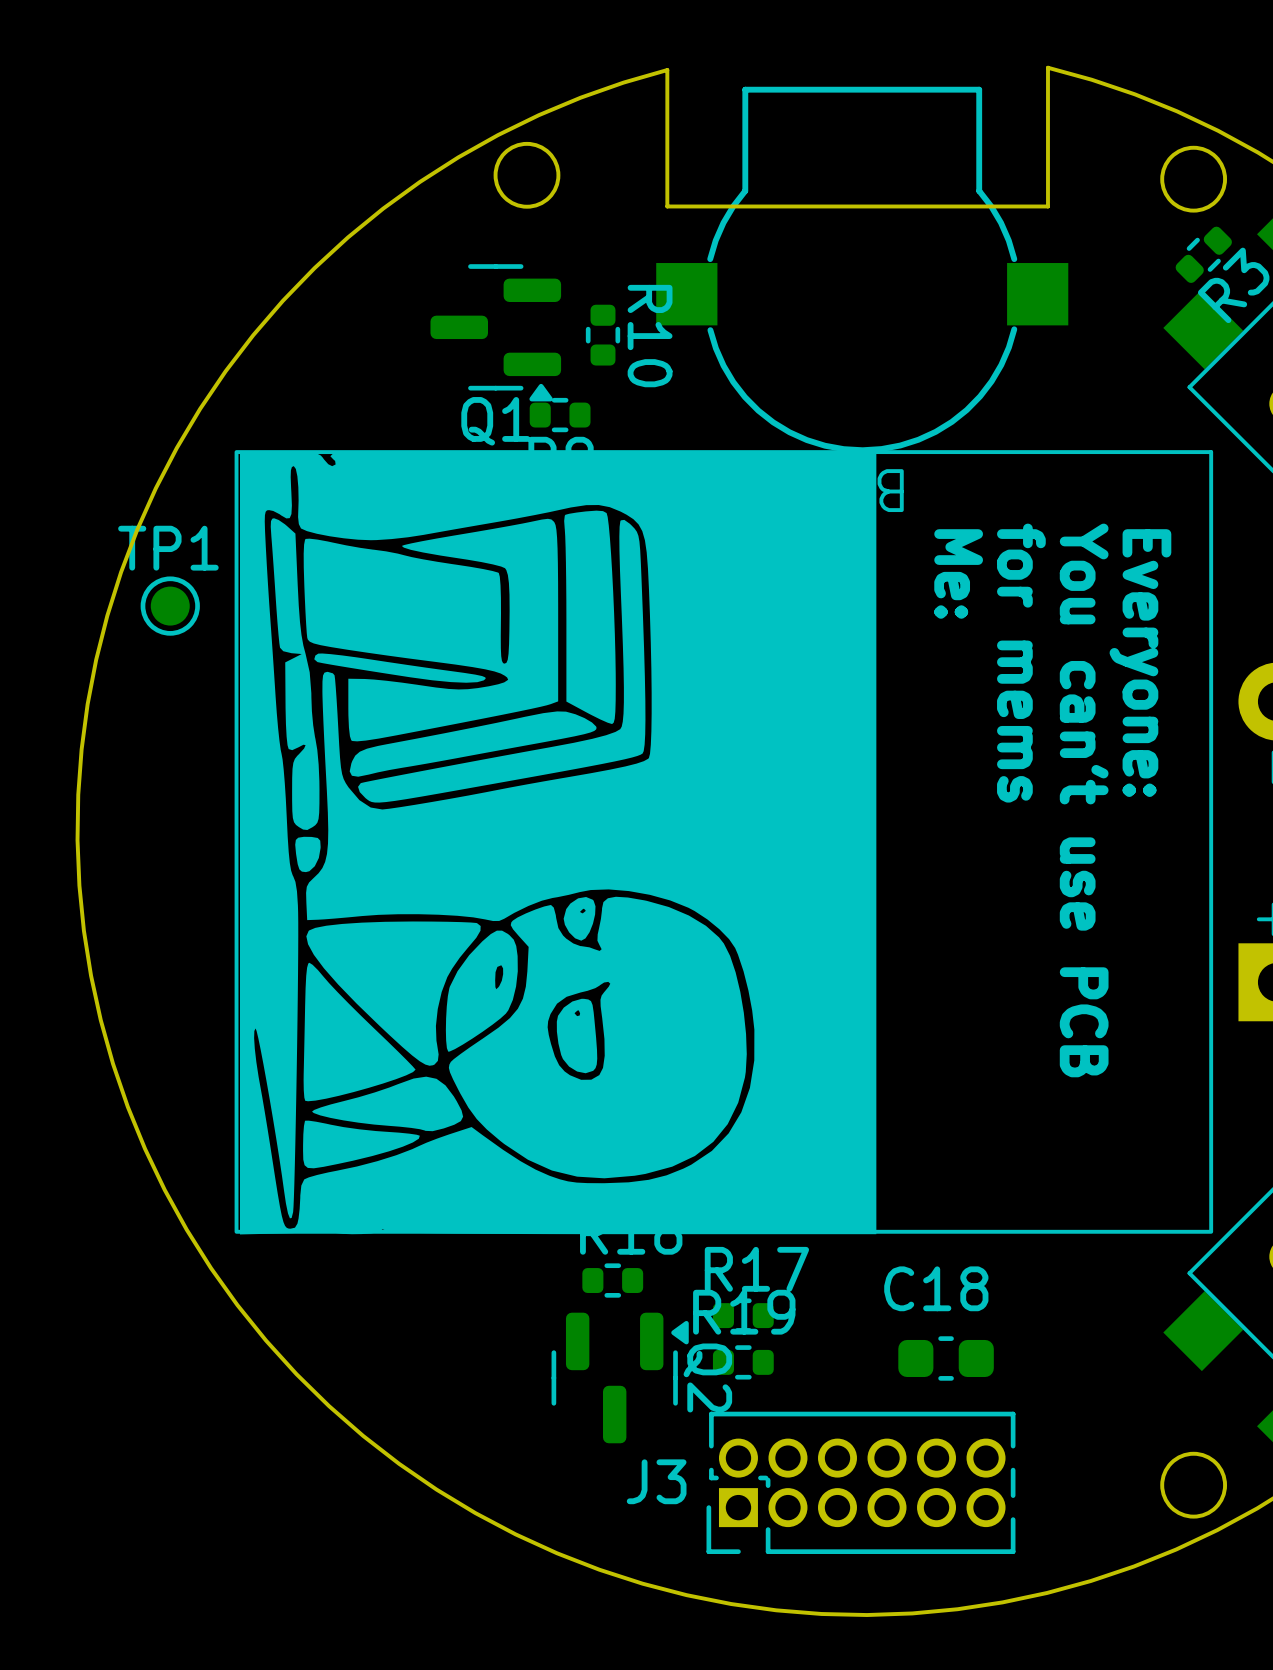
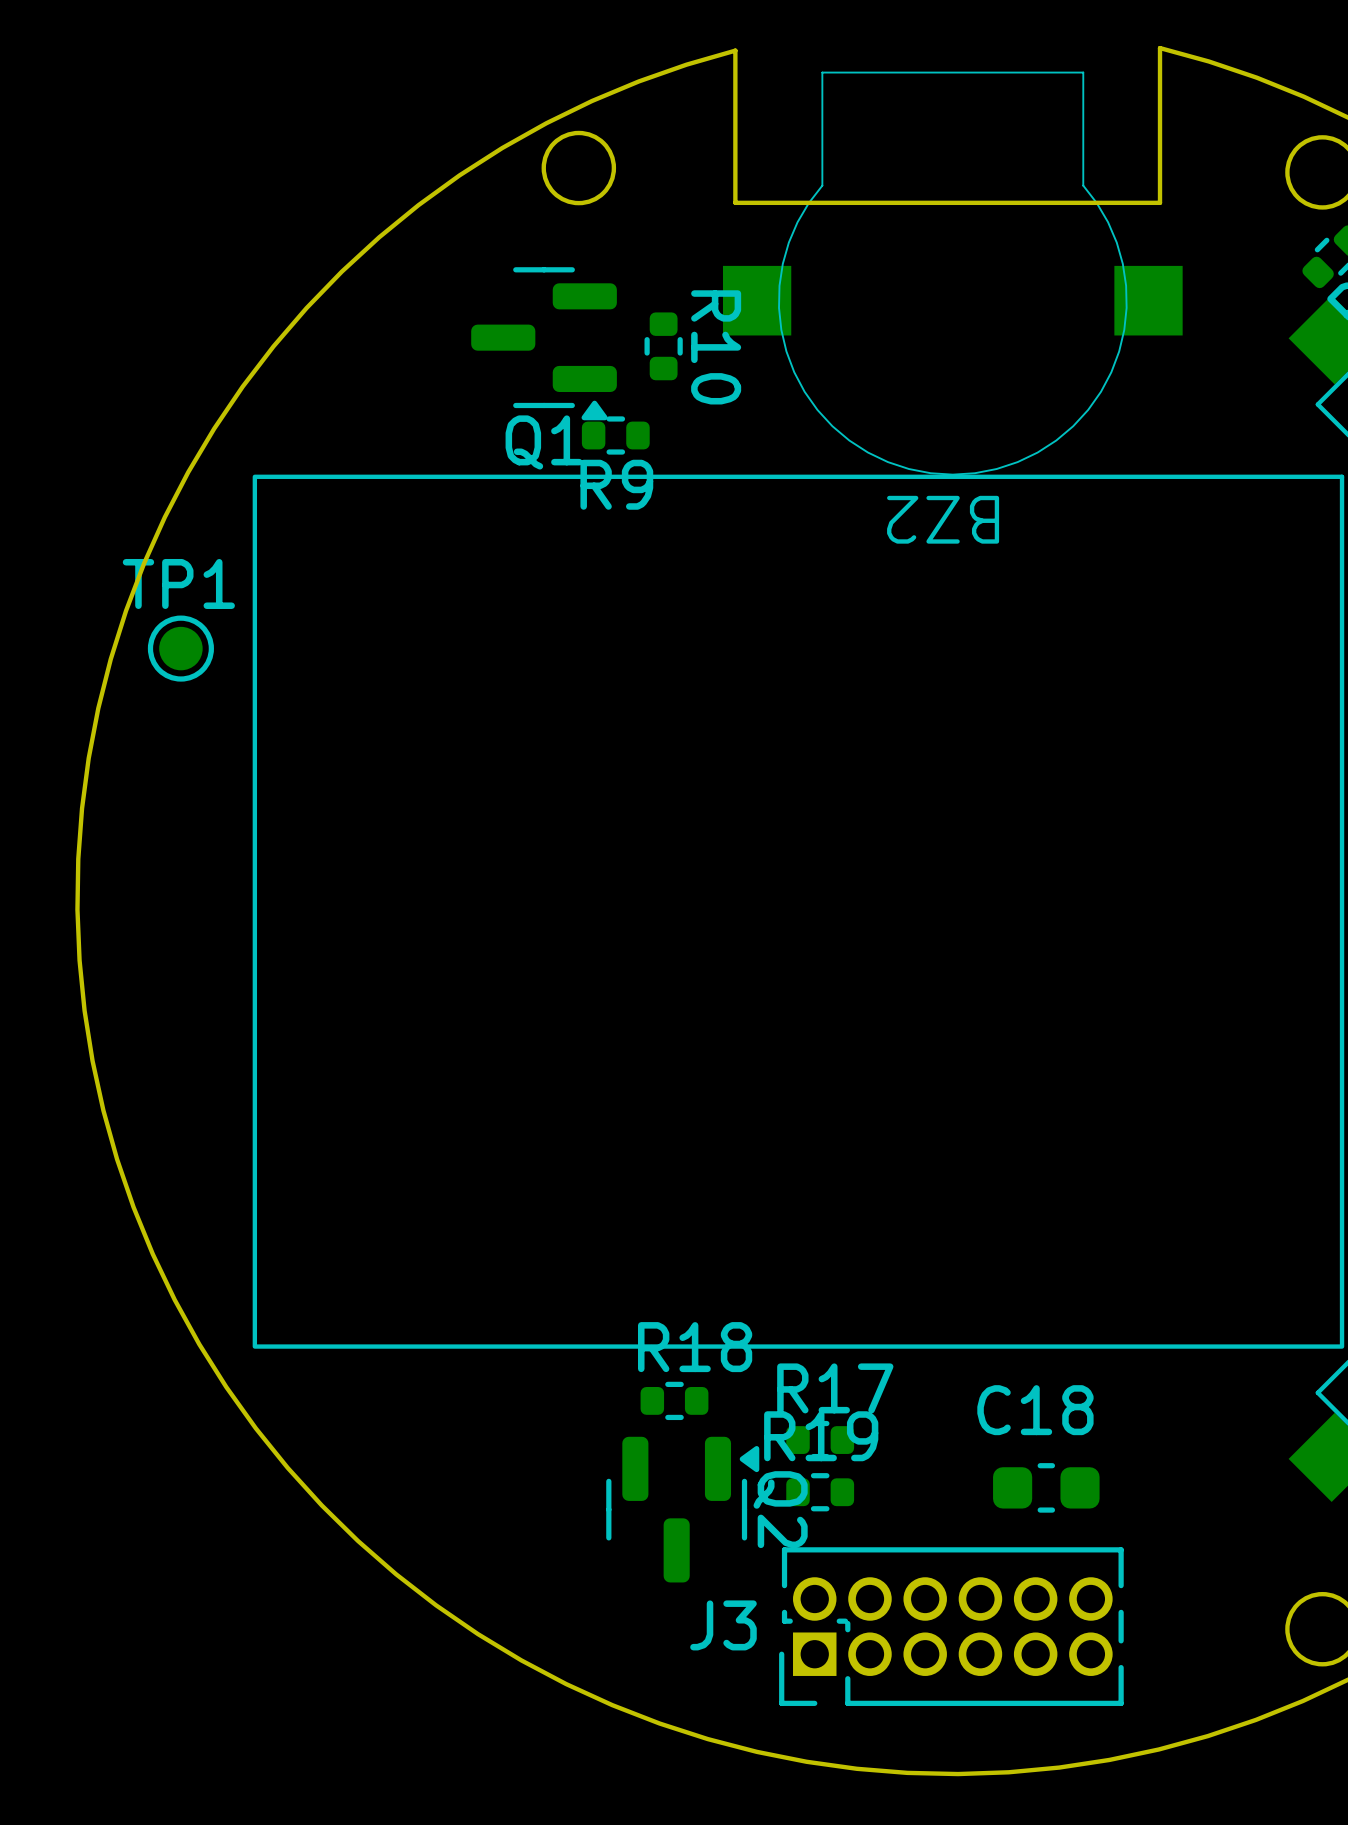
BZ2 footprint: [656, 86, 1069, 454] -> [722, 72, 1183, 476]
drawing: [239, 452, 877, 1235] -> none
text: Me: (958, 573) -> none
text: for mems (1021, 663) -> none
text: Everyone: (1140, 663) -> none
text: You can't use PCB (1084, 800) -> none

